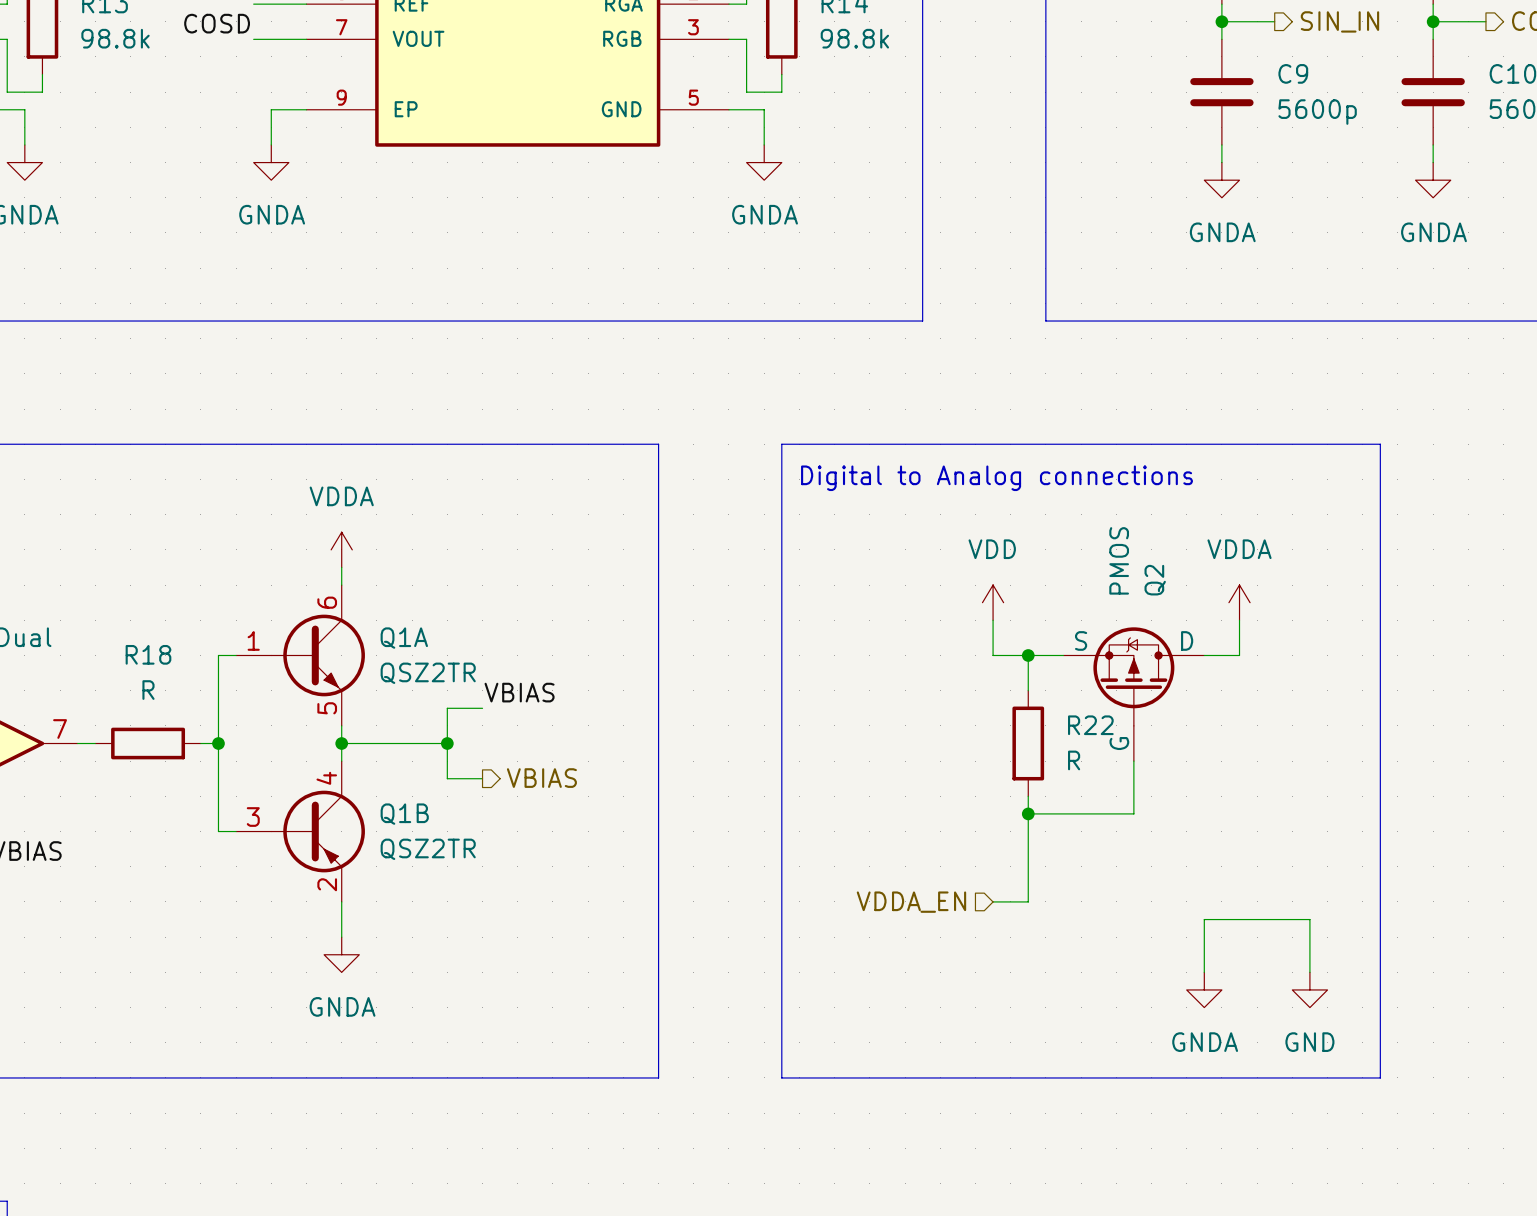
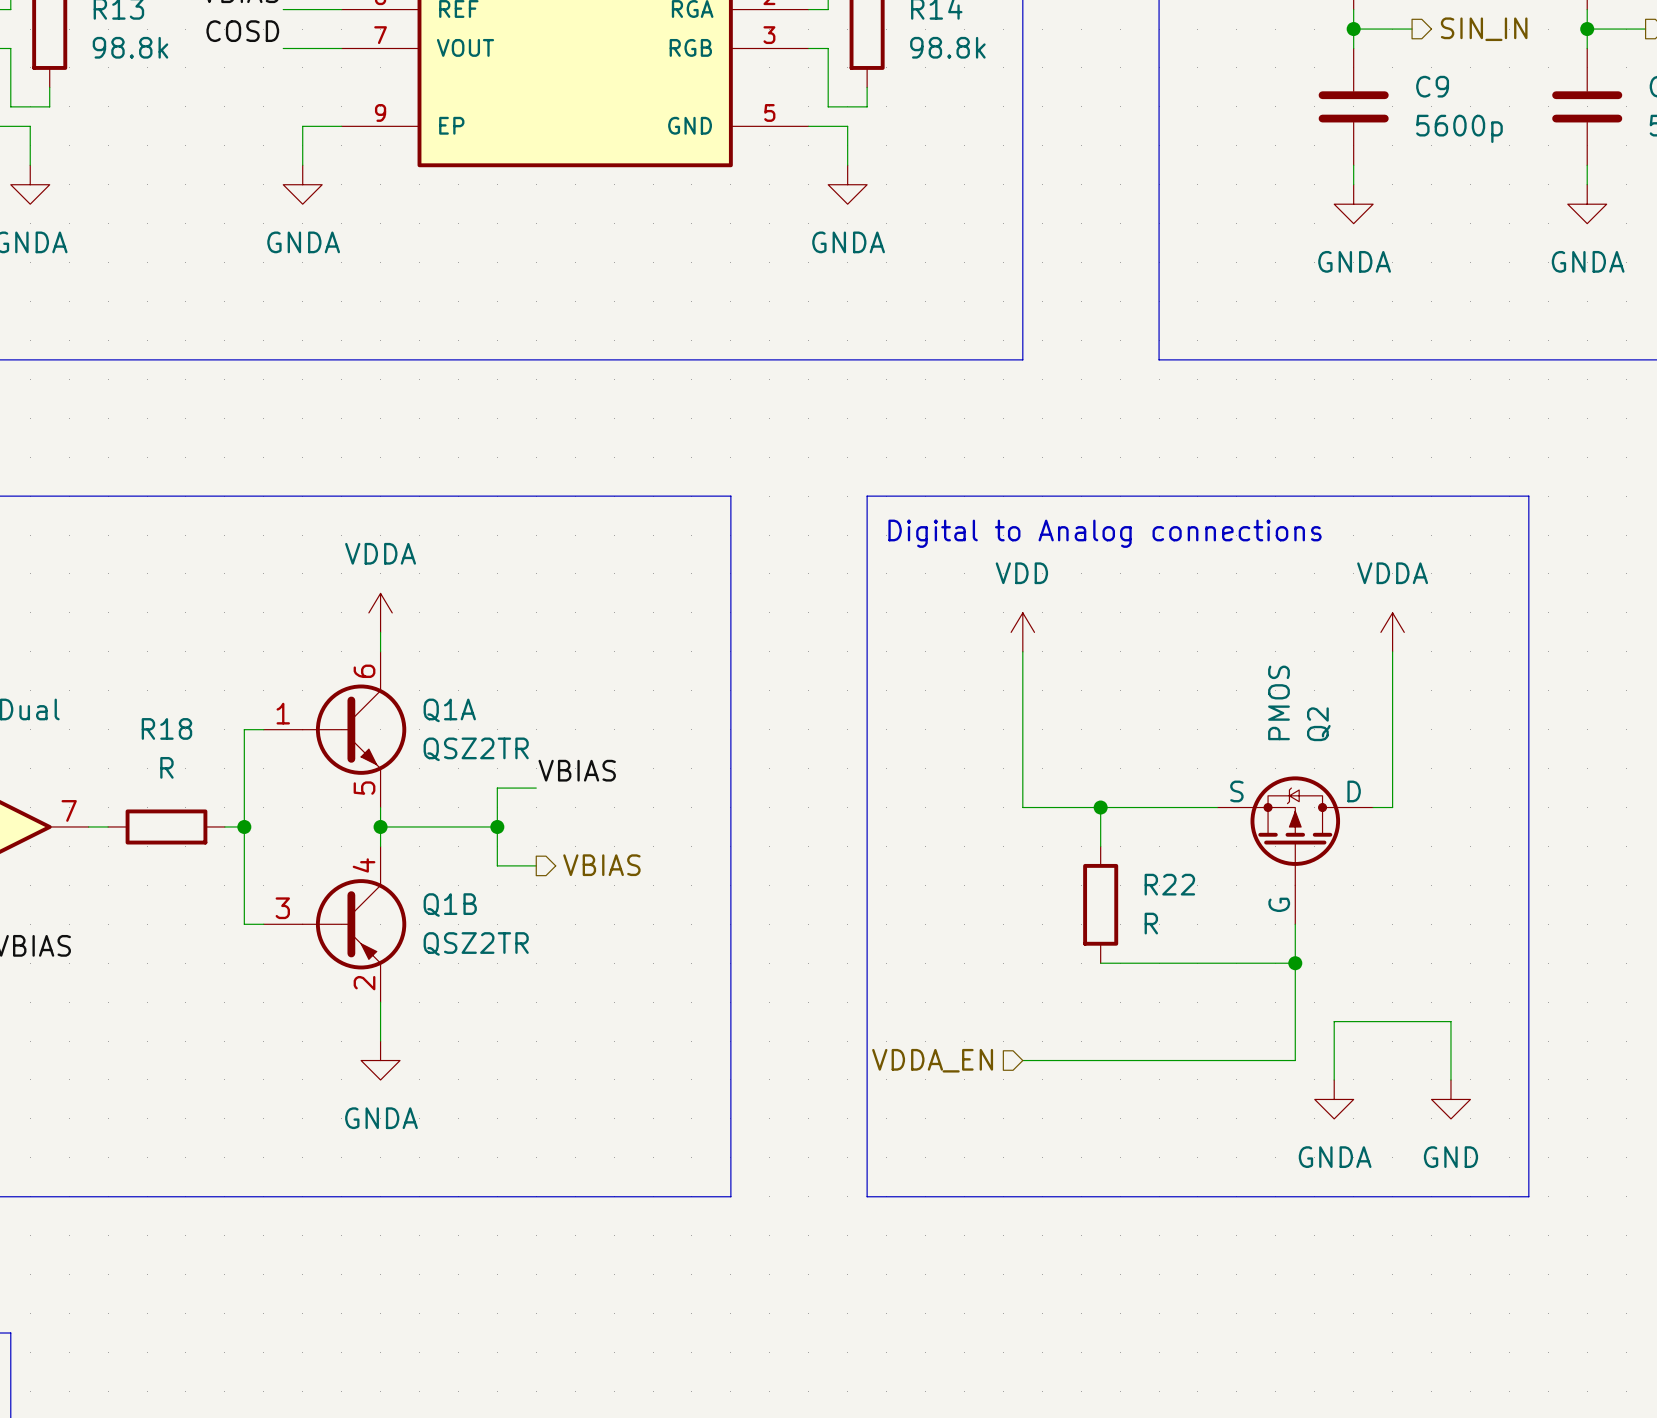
wire: none -> (1022, 651) (1022, 807) (1217, 807)
wire: none -> (1392, 651) (1392, 807) (1373, 807)
power symbol position: VDD (993, 602) -> VDD (1022, 632)
power symbol position: VDDA (1239, 602) -> VDDA (1392, 632)
wire: (993, 620) (993, 655) (1063, 655) -> none
wire: (1239, 620) (1239, 655) (1204, 655) -> none
wire: (1028, 655) (1028, 690) -> (1100, 807) (1100, 846)
junction: (1028, 655) -> none
Q2 position: (1133, 694) -> (1295, 850)
junction: none -> (1100, 807)
R22 position: (1028, 743) -> (1100, 904)
wire: (1133, 761) (1133, 813) (1028, 813) -> none
wire: (1028, 796) (1028, 901) (993, 901) -> none
junction: (1028, 813) -> none
wire: none -> (1295, 924) (1295, 1060) (1022, 1060)
wire: none -> (1100, 963) (1295, 963)
junction: none -> (1295, 963)
hierarchical label position: VDDA_EN (911, 902) -> VDDA_EN (932, 1060)

